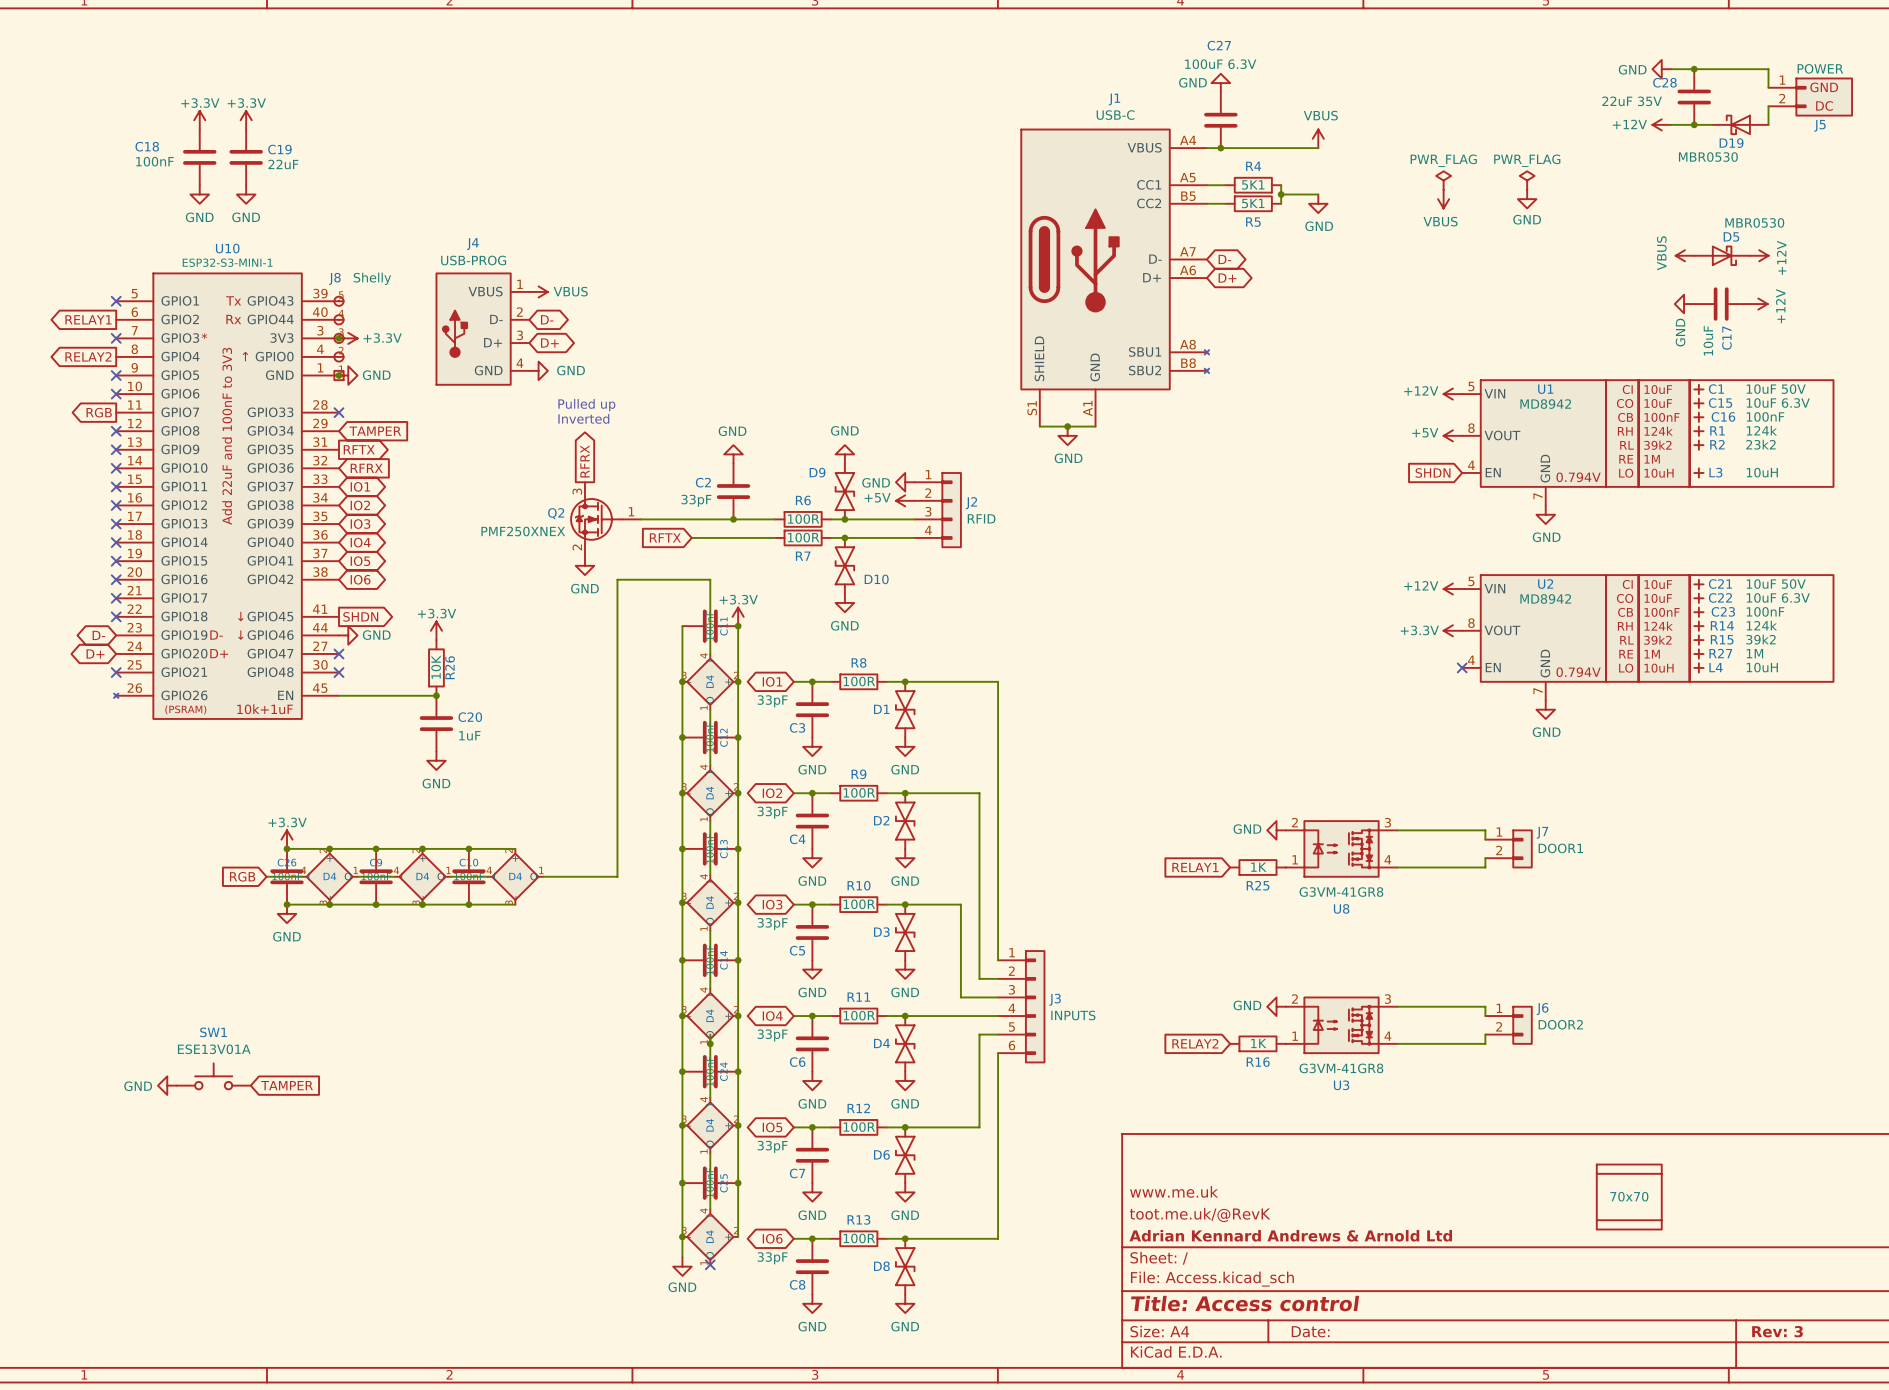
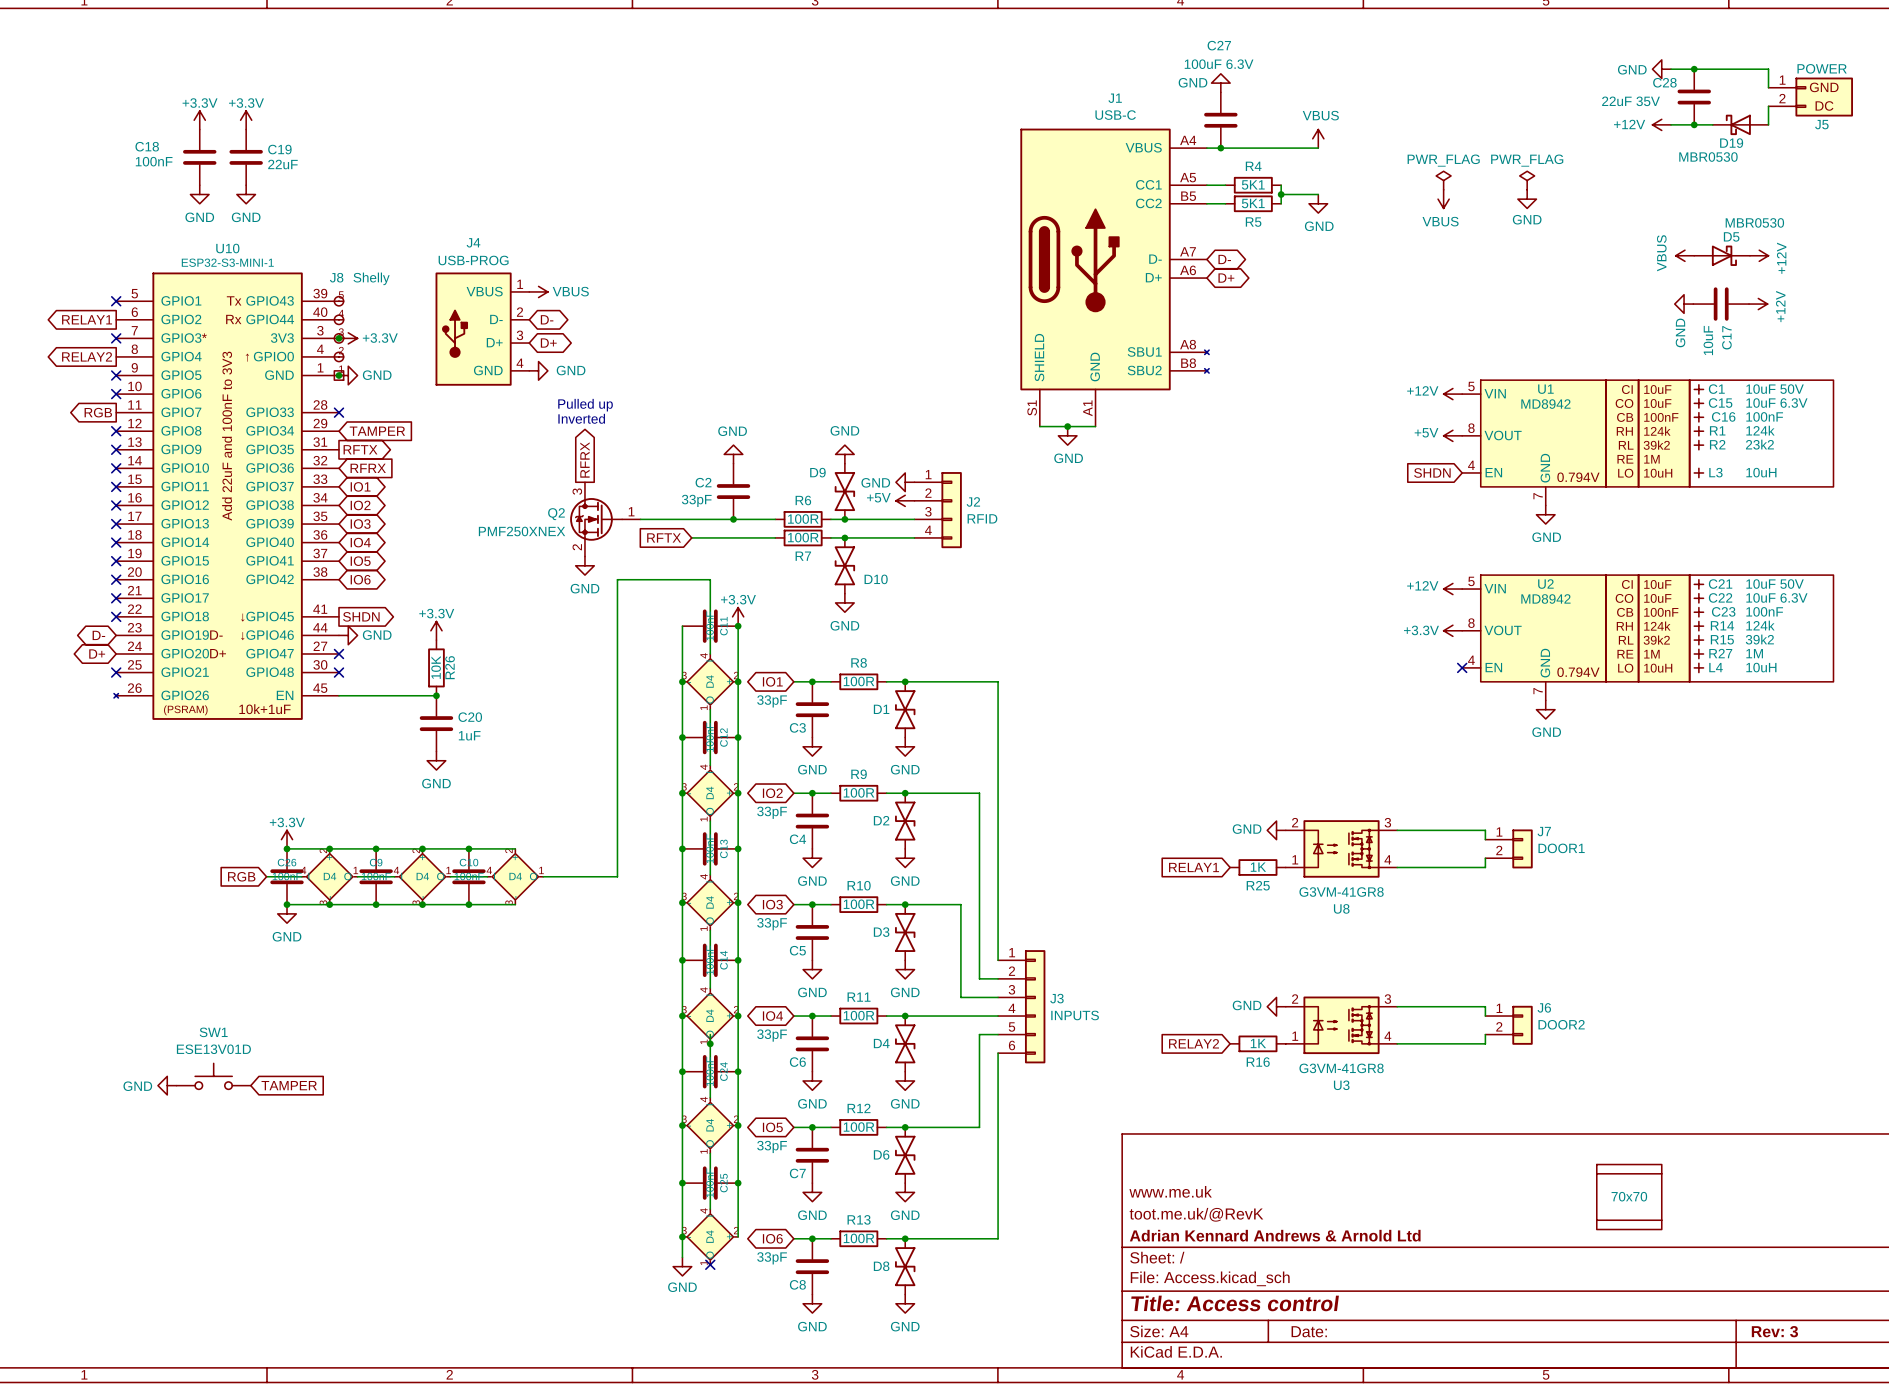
SW1 value: ESE13V01A (214, 1049) -> ESE13V01D (213, 1049)

